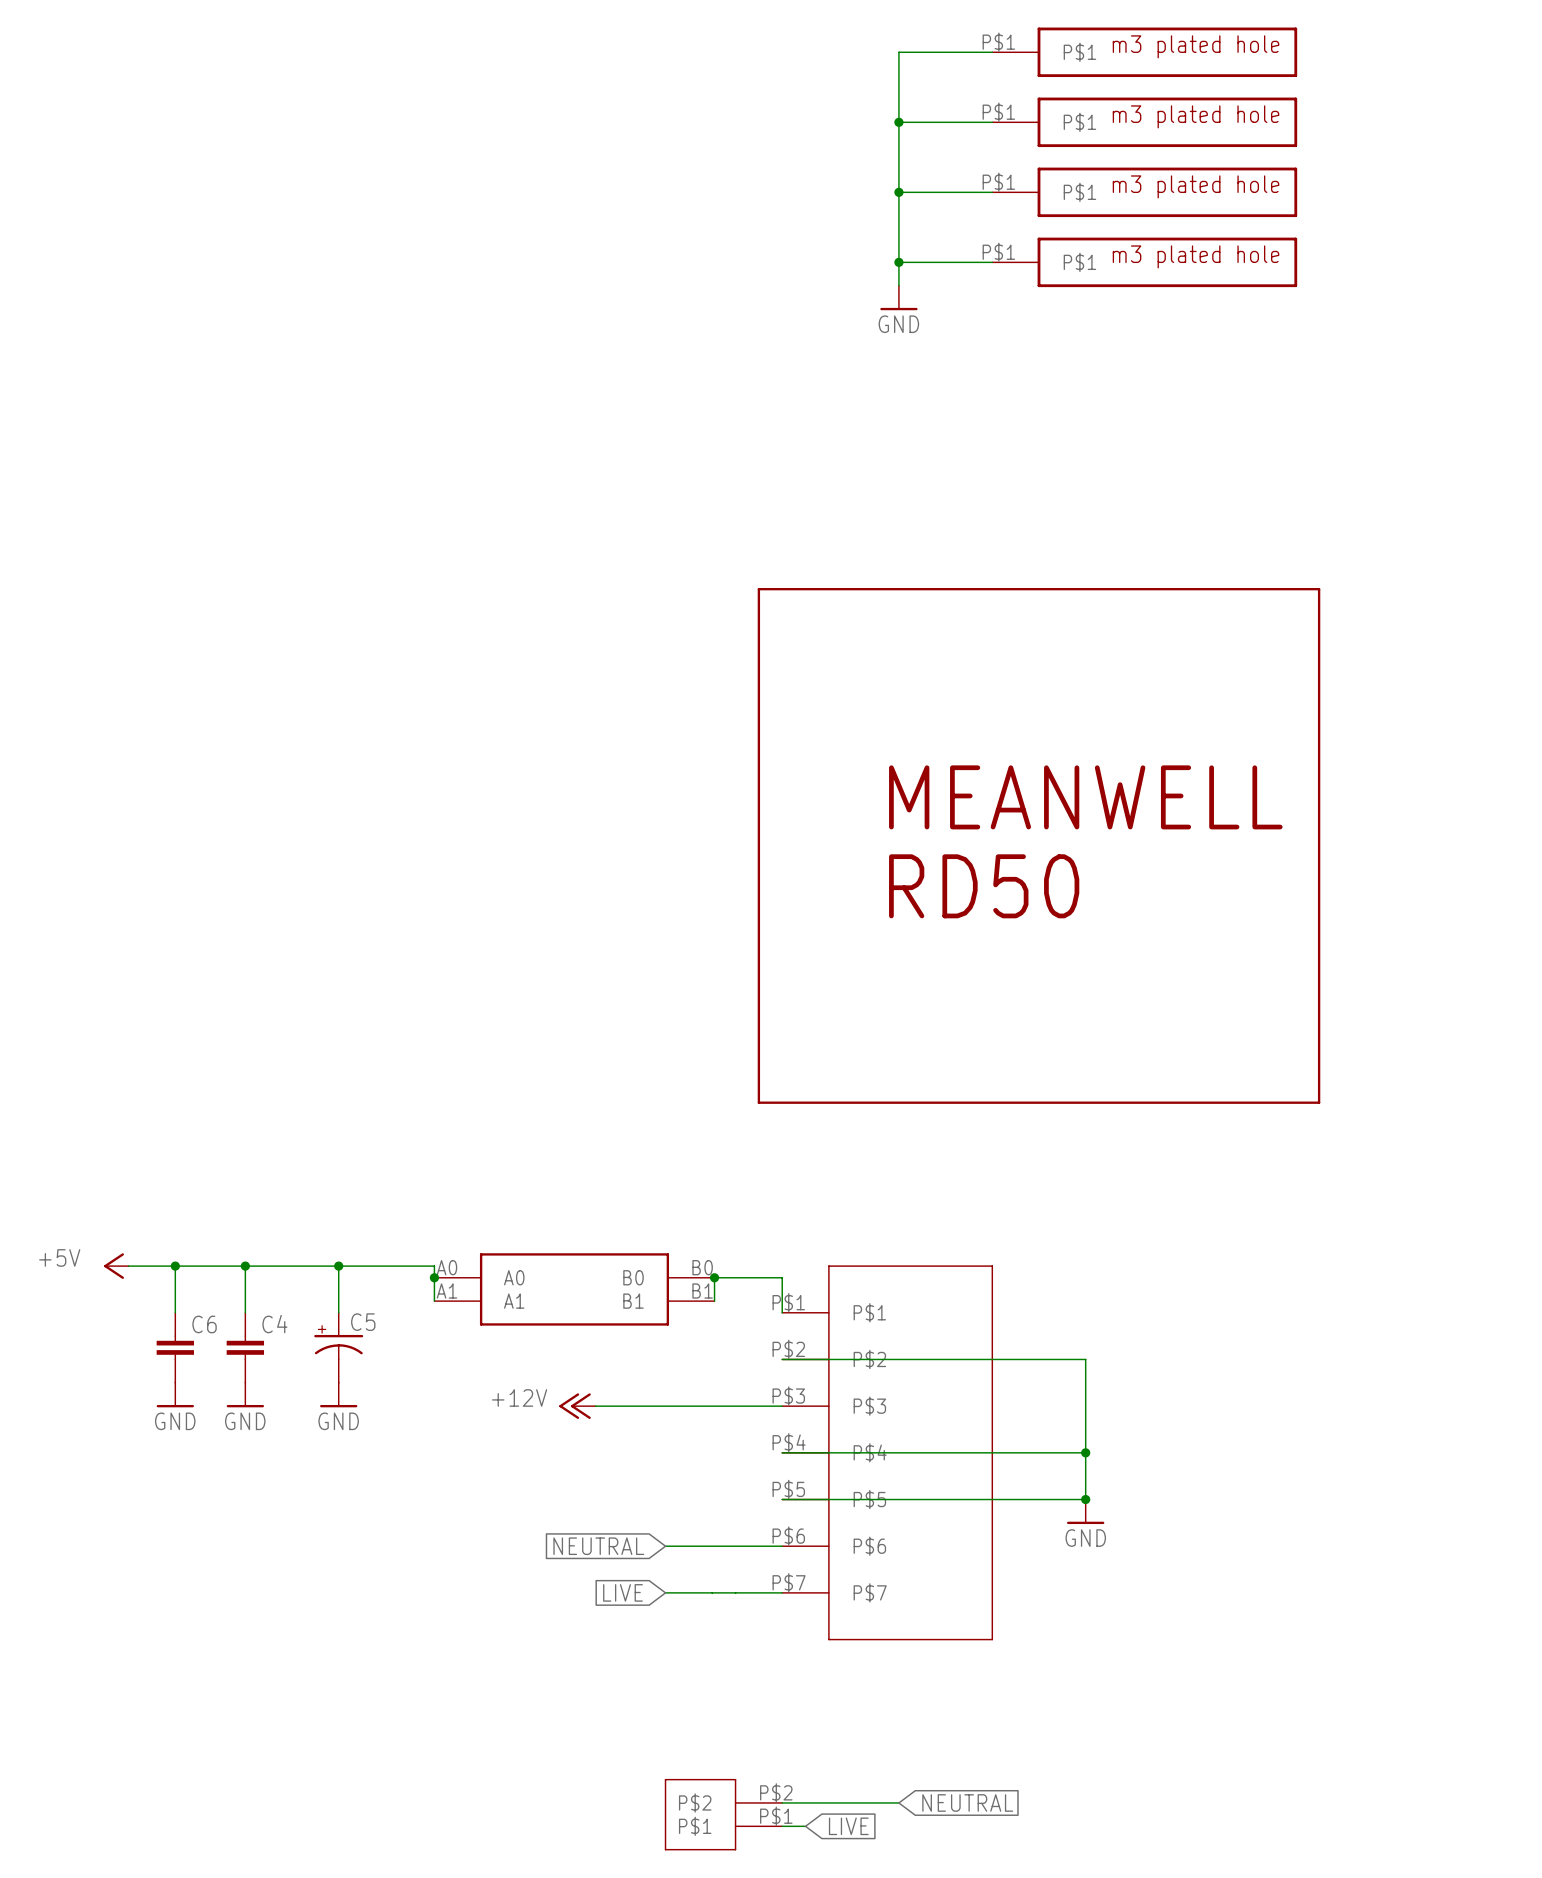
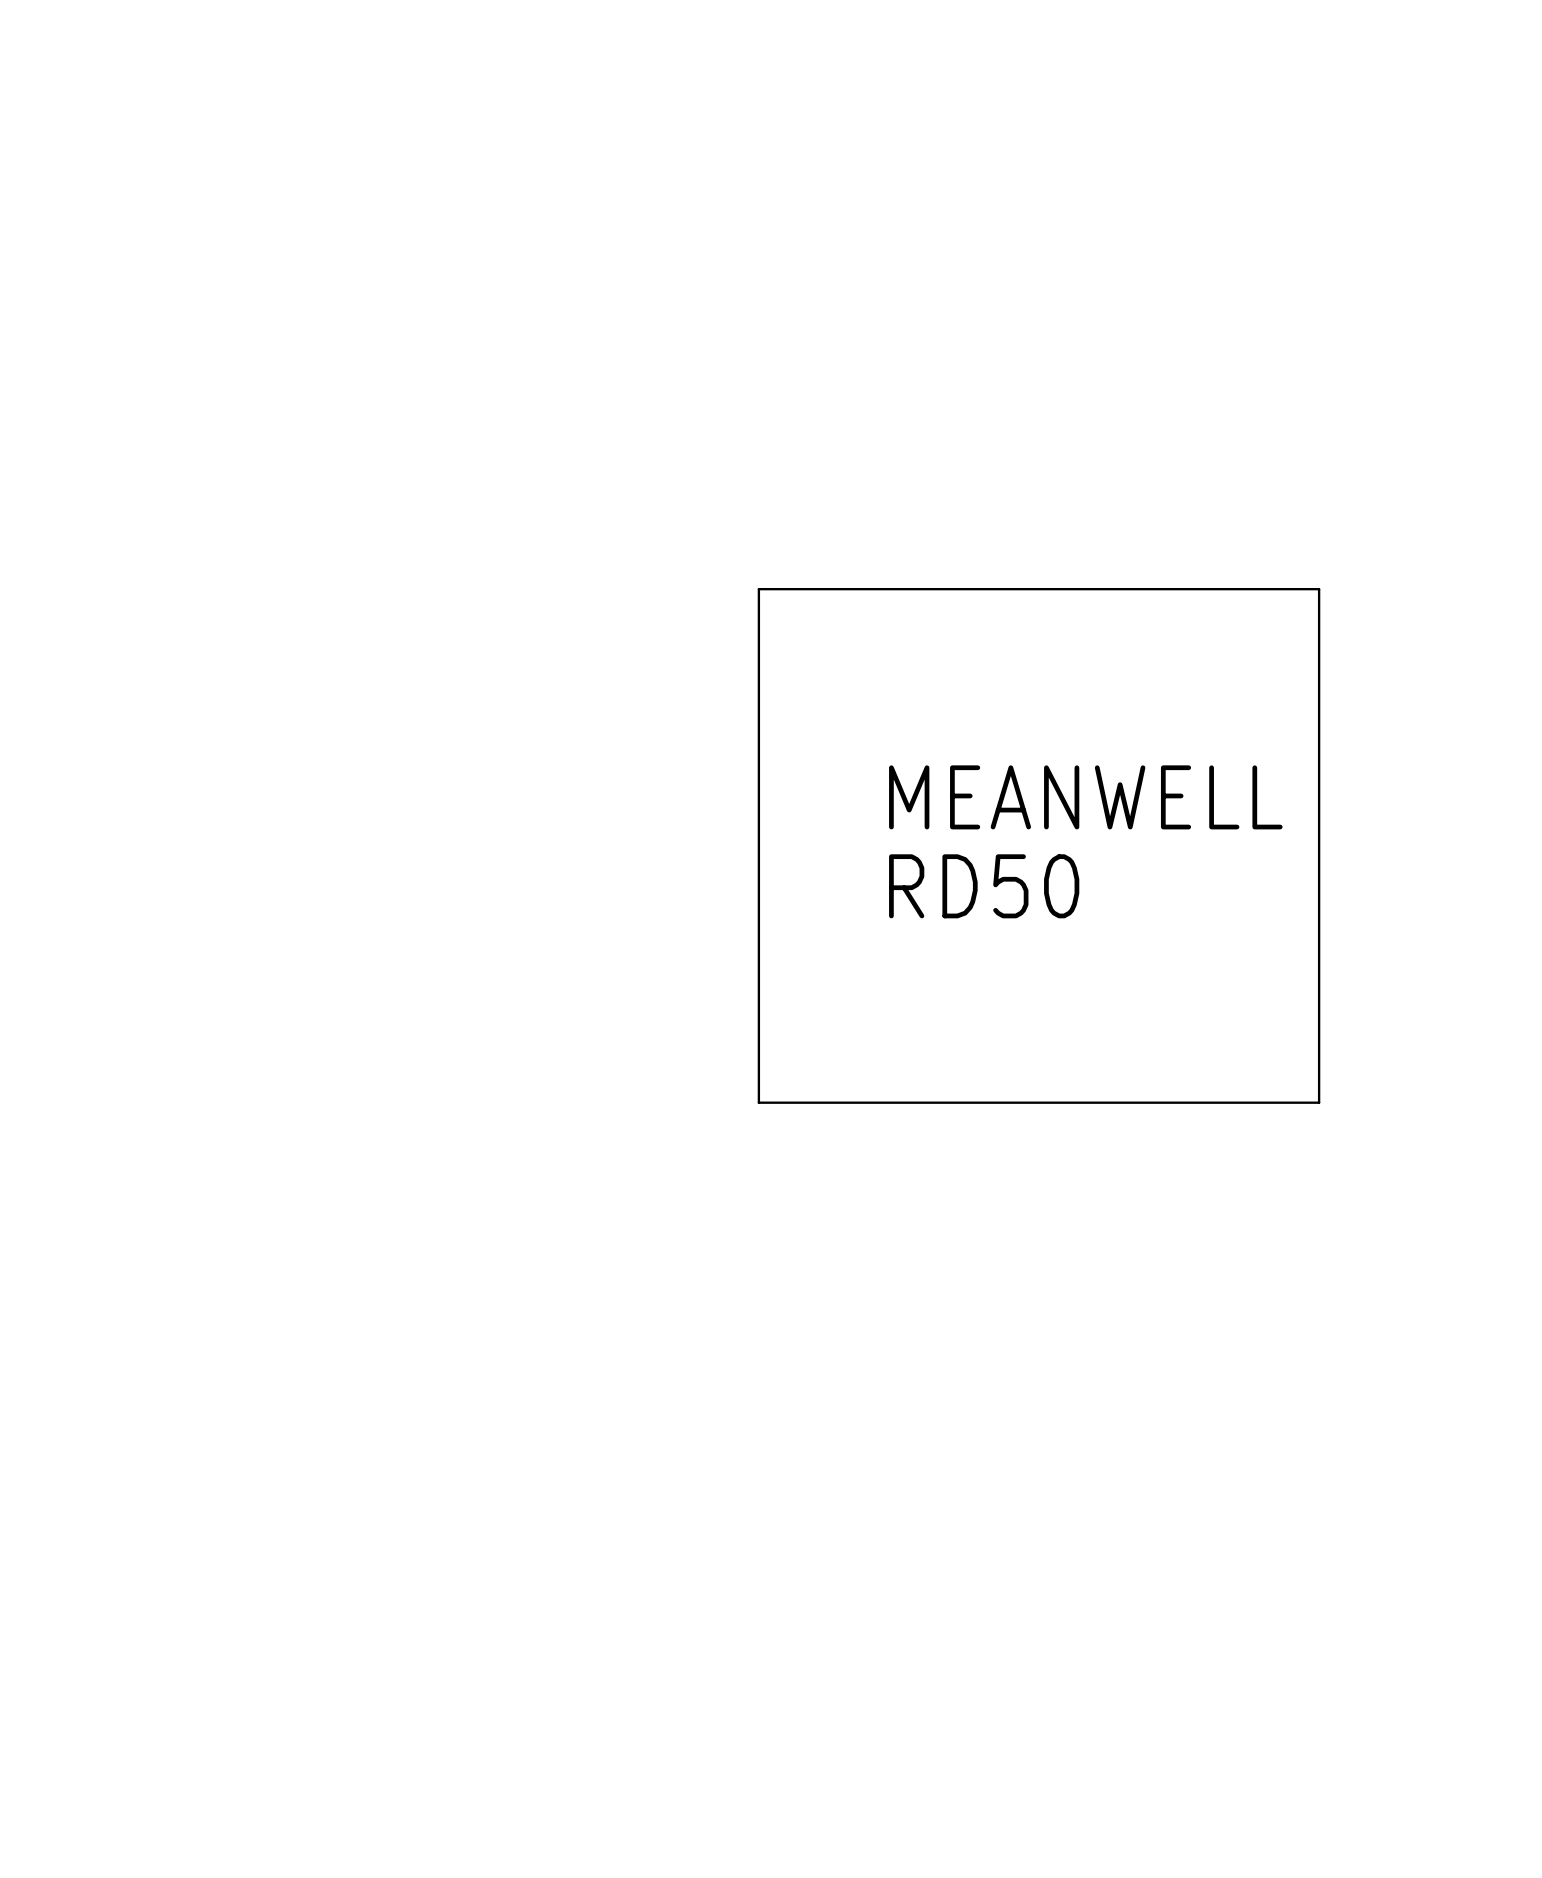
wire: (992, 52) (898, 52) (898, 285) -> none
part: (1144, 52) -> none
wire: (898, 122) (992, 122) -> none
junction: (898, 122) -> none
part: (1144, 122) -> none
wire: (898, 192) (992, 192) -> none
junction: (898, 192) -> none
part: (1144, 192) -> none
wire: (898, 262) (992, 262) -> none
junction: (898, 262) -> none
part: (1144, 262) -> none
power symbol: GND (898, 297) -> none
power symbol: +5V (116, 1266) -> none
wire: (128, 1266) (434, 1266) (434, 1301) -> none
wire: (175, 1266) (175, 1312) -> none
junction: (175, 1266) -> none
wire: (245, 1266) (245, 1312) -> none
junction: (245, 1266) -> none
wire: (338, 1266) (338, 1312) -> none
junction: (338, 1266) -> none
junction: (434, 1277) -> none
junction: (714, 1277) -> none
part: (574, 1289) -> none
wire: (714, 1301) (714, 1277) (782, 1277) (782, 1312) -> none
C6: (175, 1347) -> none
C4: (245, 1347) -> none
C5: (338, 1347) -> none
wire: (782, 1359) (1085, 1359) (1085, 1499) (782, 1499) -> none
power symbol: GND (175, 1395) -> none
power symbol: GND (245, 1395) -> none
power symbol: GND (338, 1395) -> none
power symbol: +12V (577, 1406) -> none
wire: (595, 1406) (782, 1406) -> none
wire: (782, 1452) (1085, 1452) -> none
part: (887, 1452) -> none
junction: (1085, 1452) -> none
junction: (1085, 1499) -> none
power symbol: GND (1085, 1511) -> none
global label: NEUTRAL (598, 1546) -> none
wire: (665, 1546) (782, 1546) -> none
global label: LIVE (622, 1592) -> none
wire: (665, 1592) (782, 1592) -> none
wire: (782, 1802) (898, 1802) -> none
global label: NEUTRAL (967, 1802) -> none
part: (723, 1814) -> none
wire: (782, 1826) (805, 1826) -> none
global label: LIVE (848, 1826) -> none

